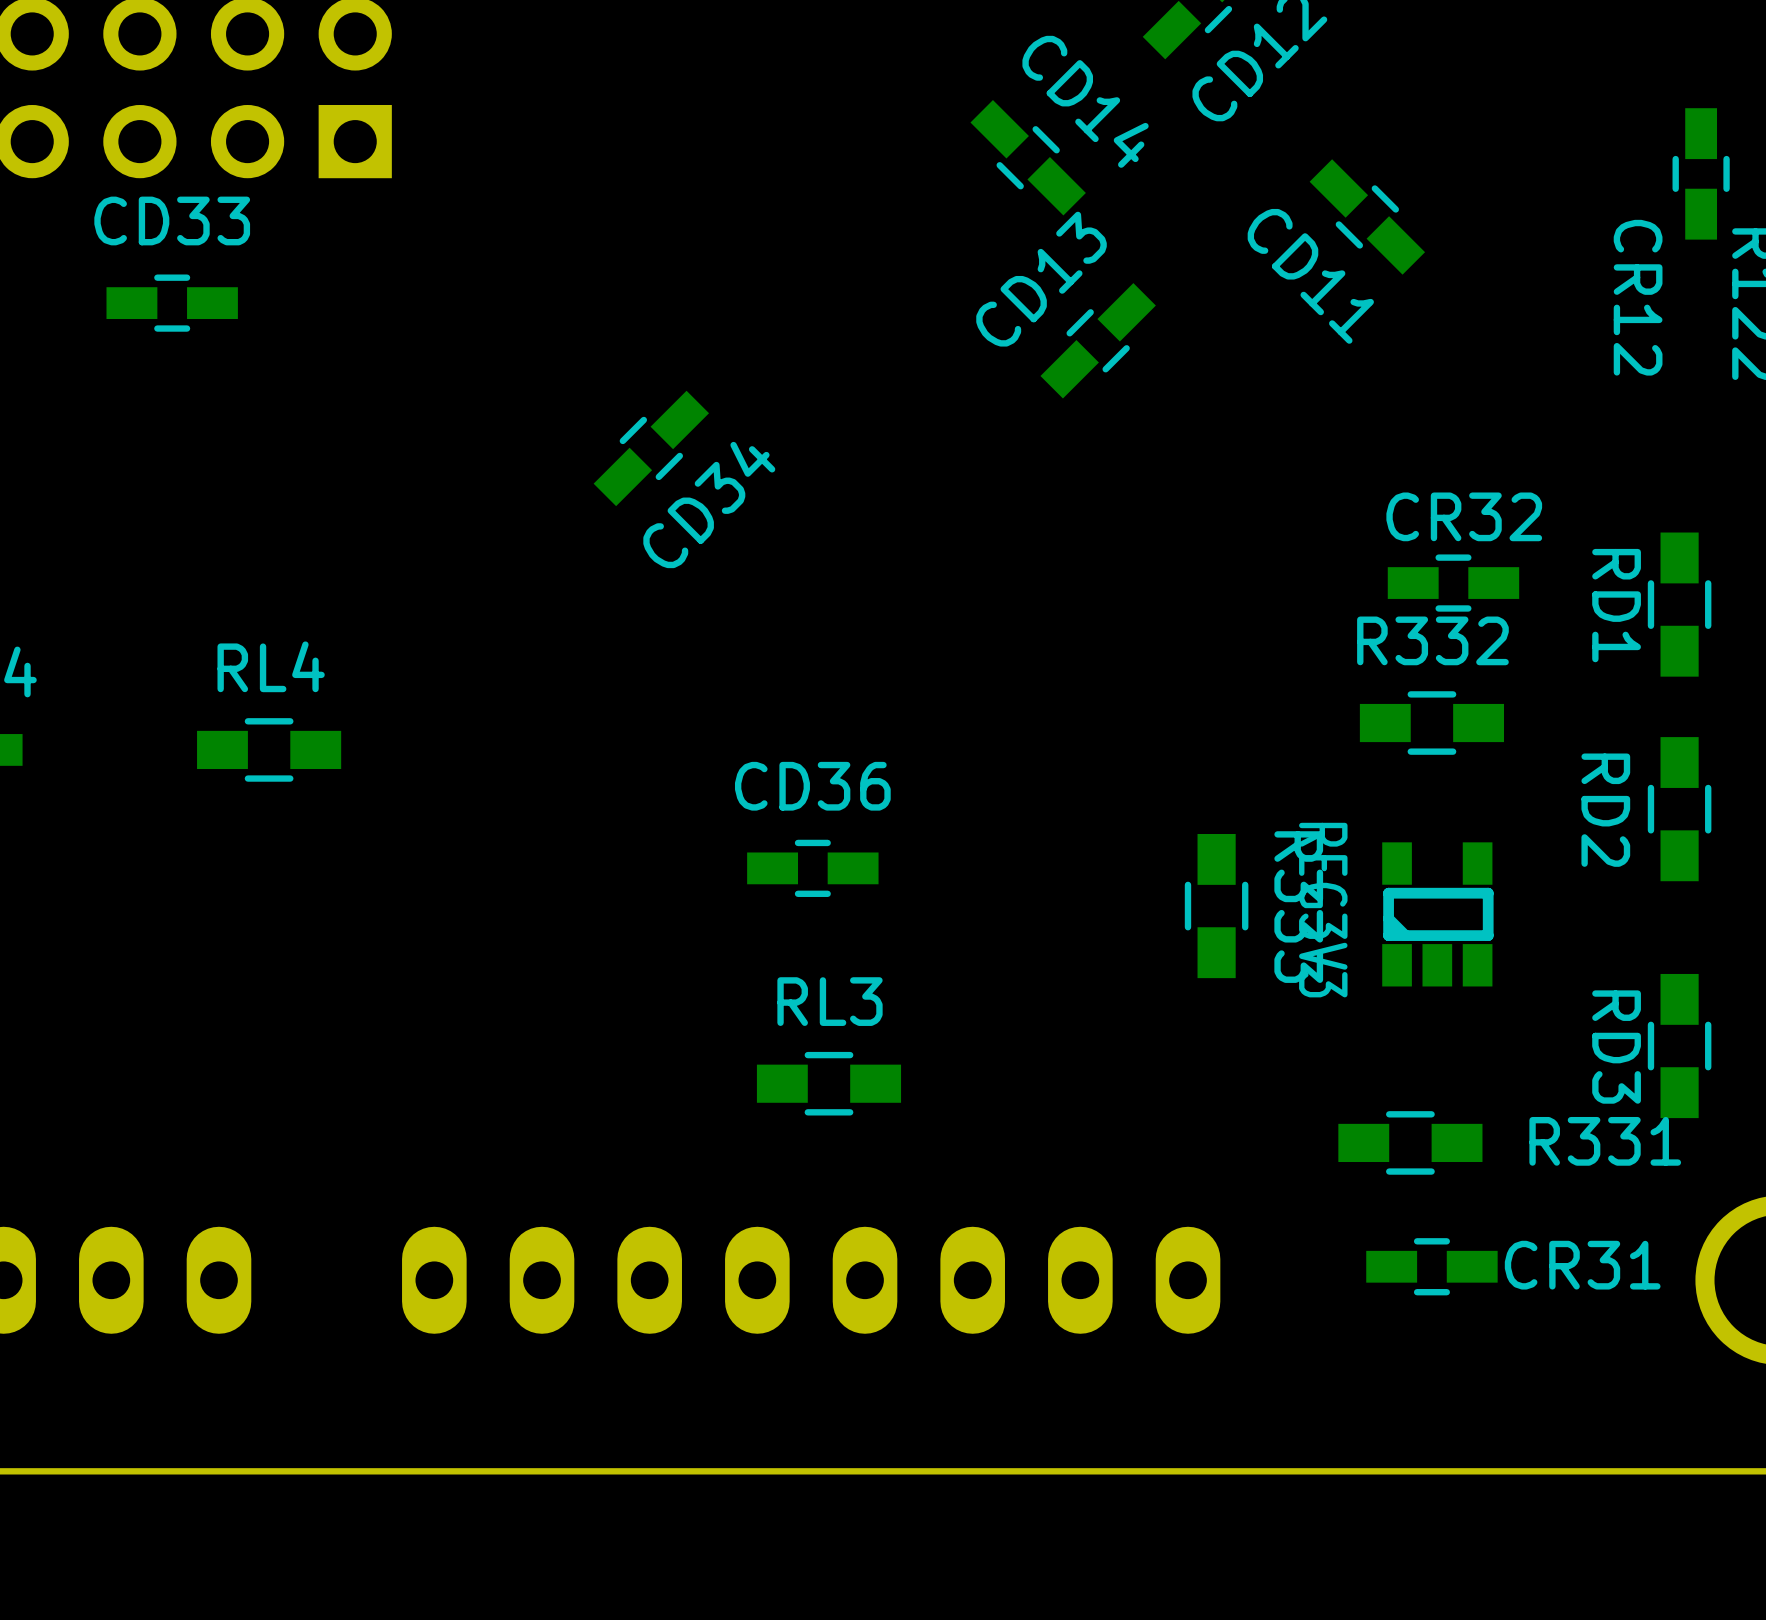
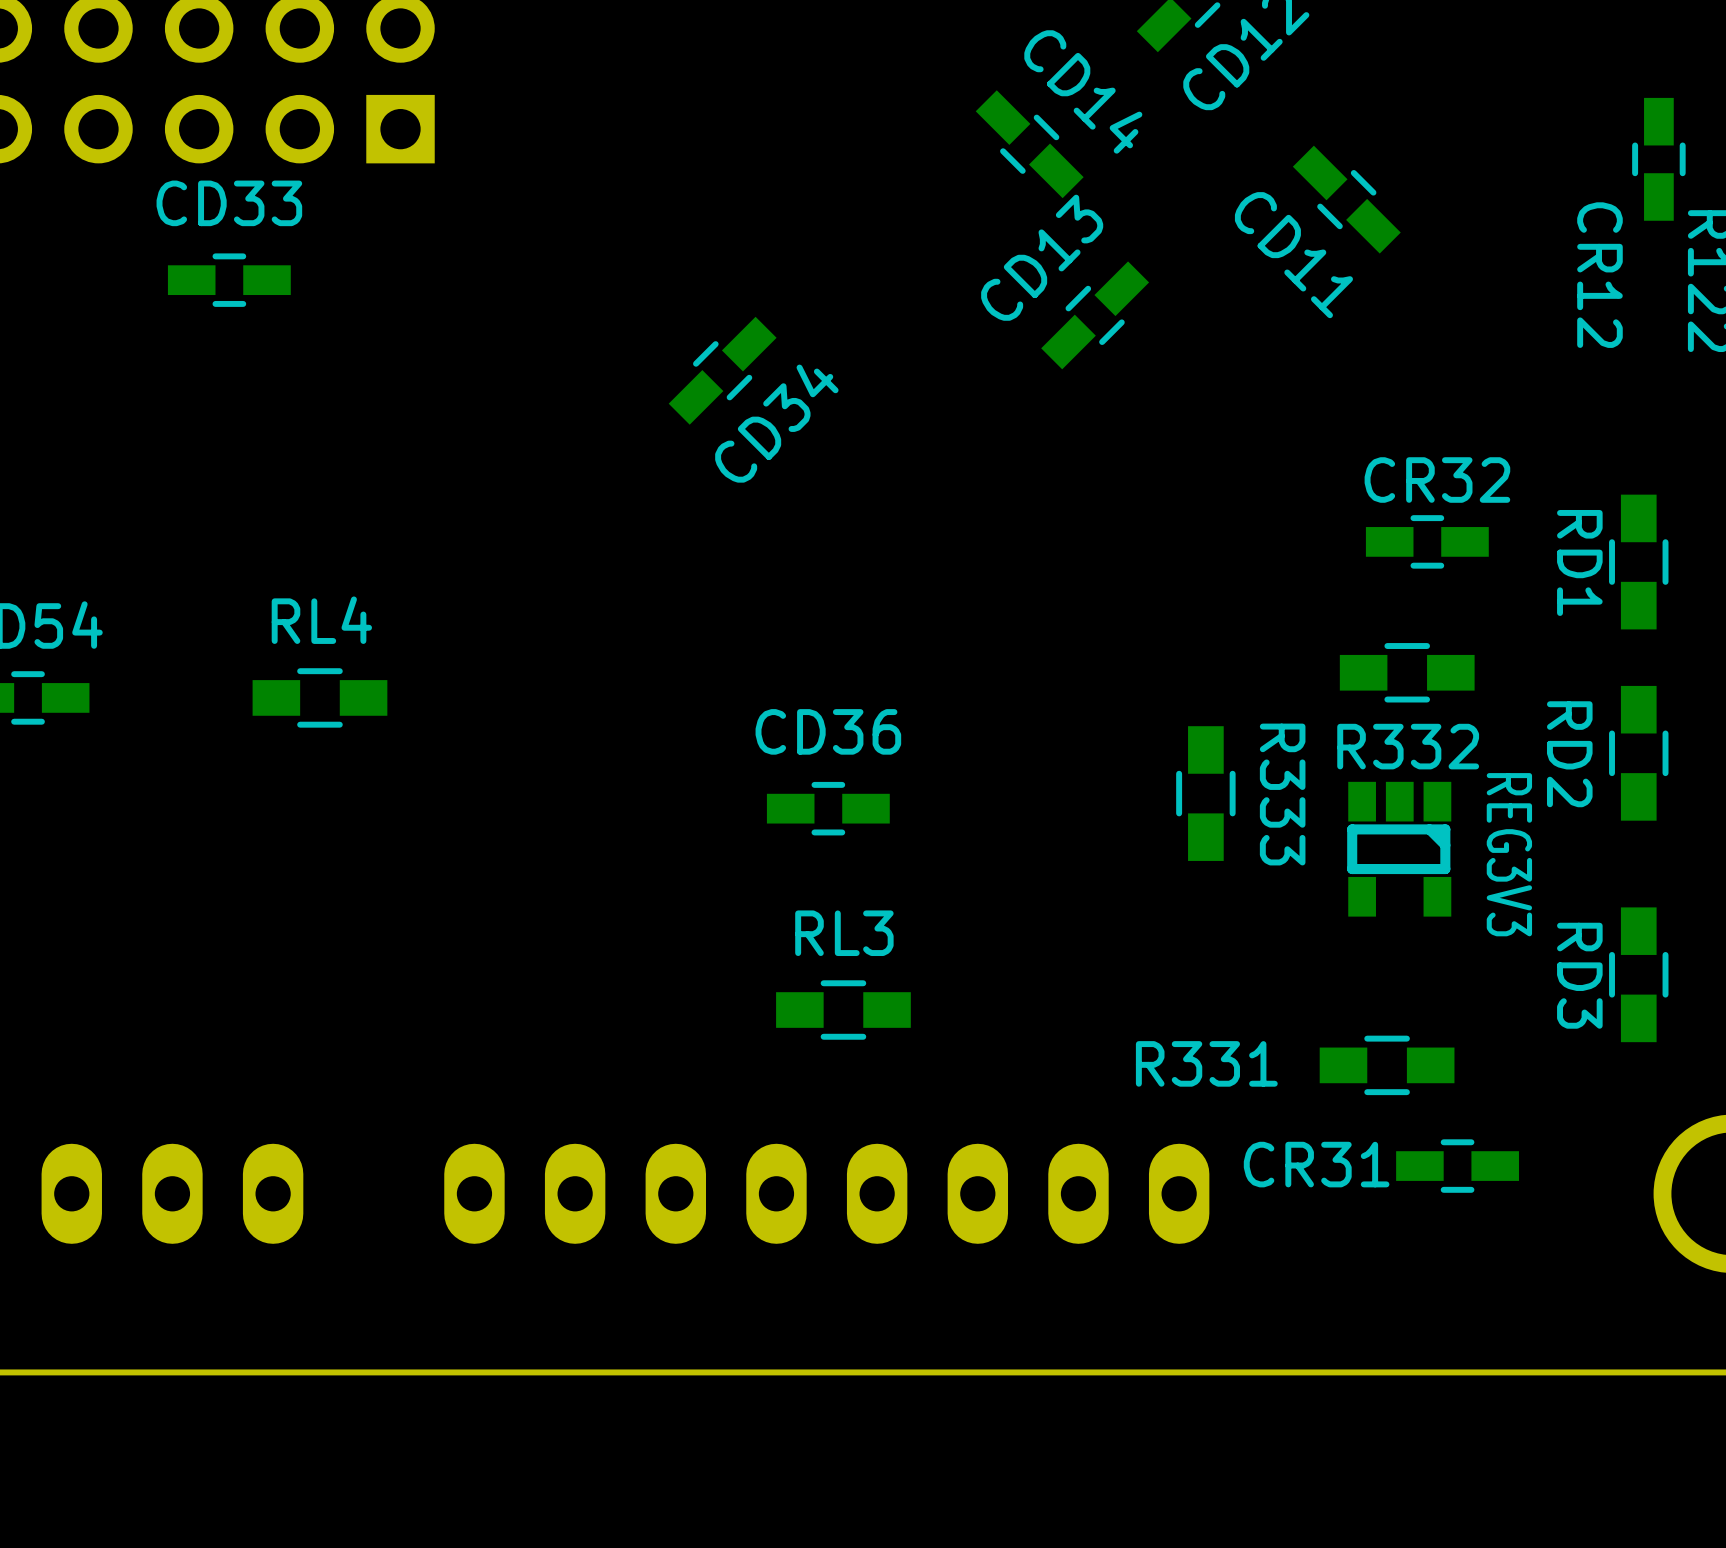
CD34 position: (651, 448) -> (722, 370)
R332 name position: R332 (1432, 640) -> R332 (1408, 746)
R333 position: (1216, 906) -> (1205, 793)
REG3V3 rotation: 0° (1437, 914) -> 180° (1399, 849)
R331 name position: R331 (1605, 1141) -> R331 (1206, 1063)
CR31 name position: CR31 (1582, 1265) -> CR31 (1316, 1164)
CR31 position: (1431, 1266) -> (1457, 1166)

